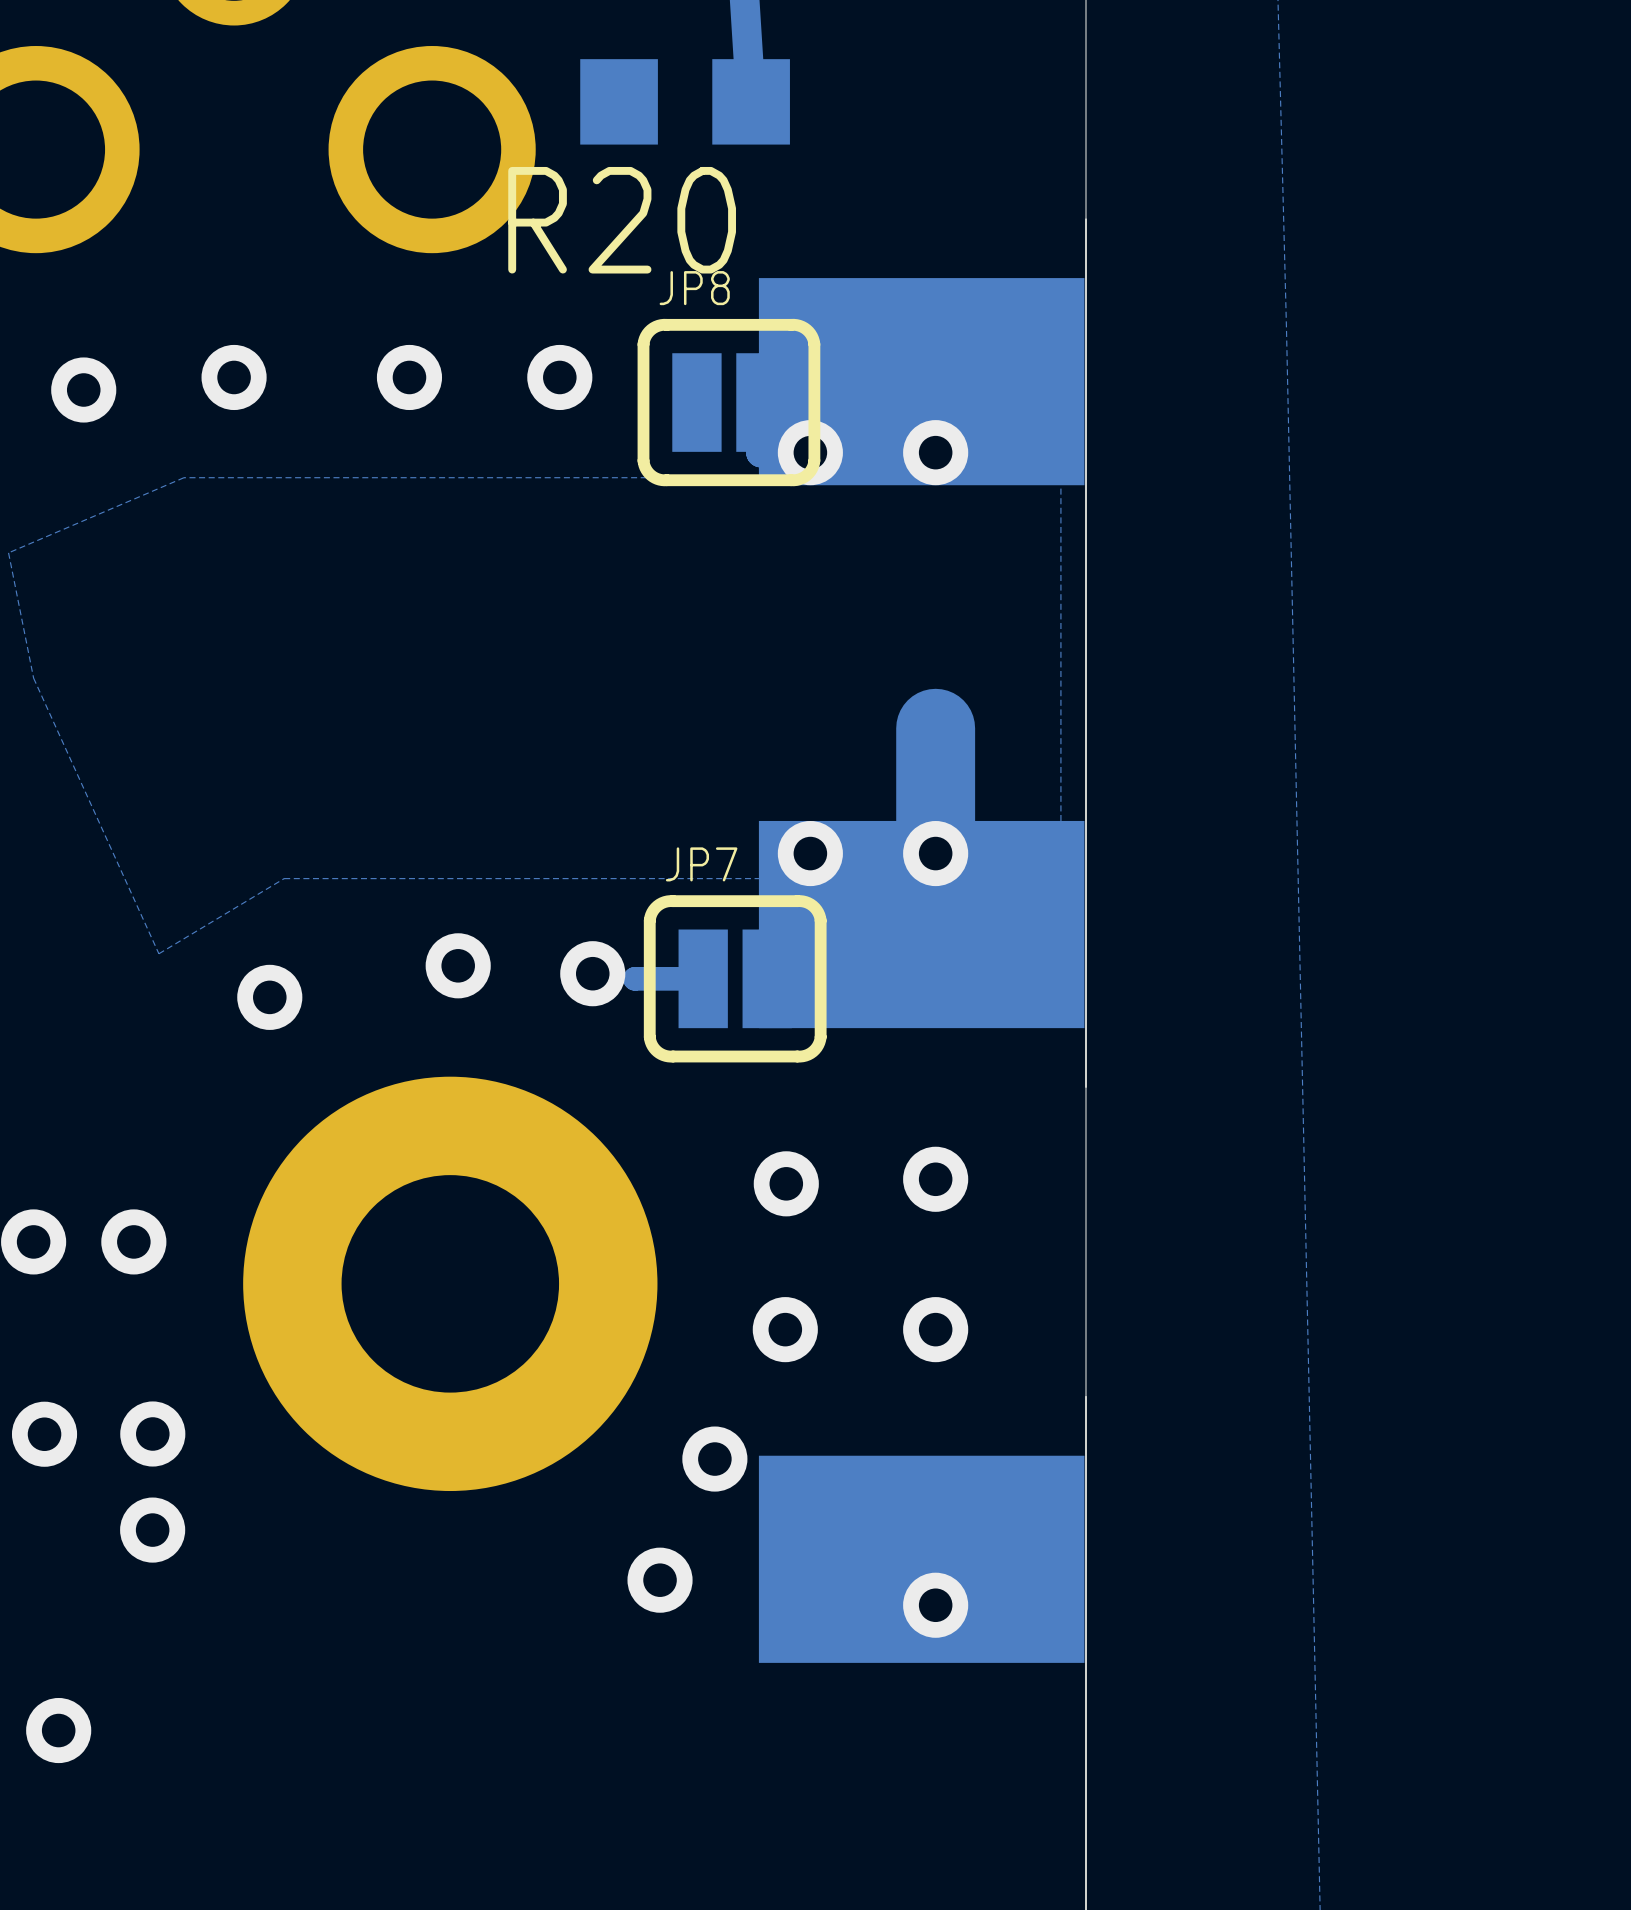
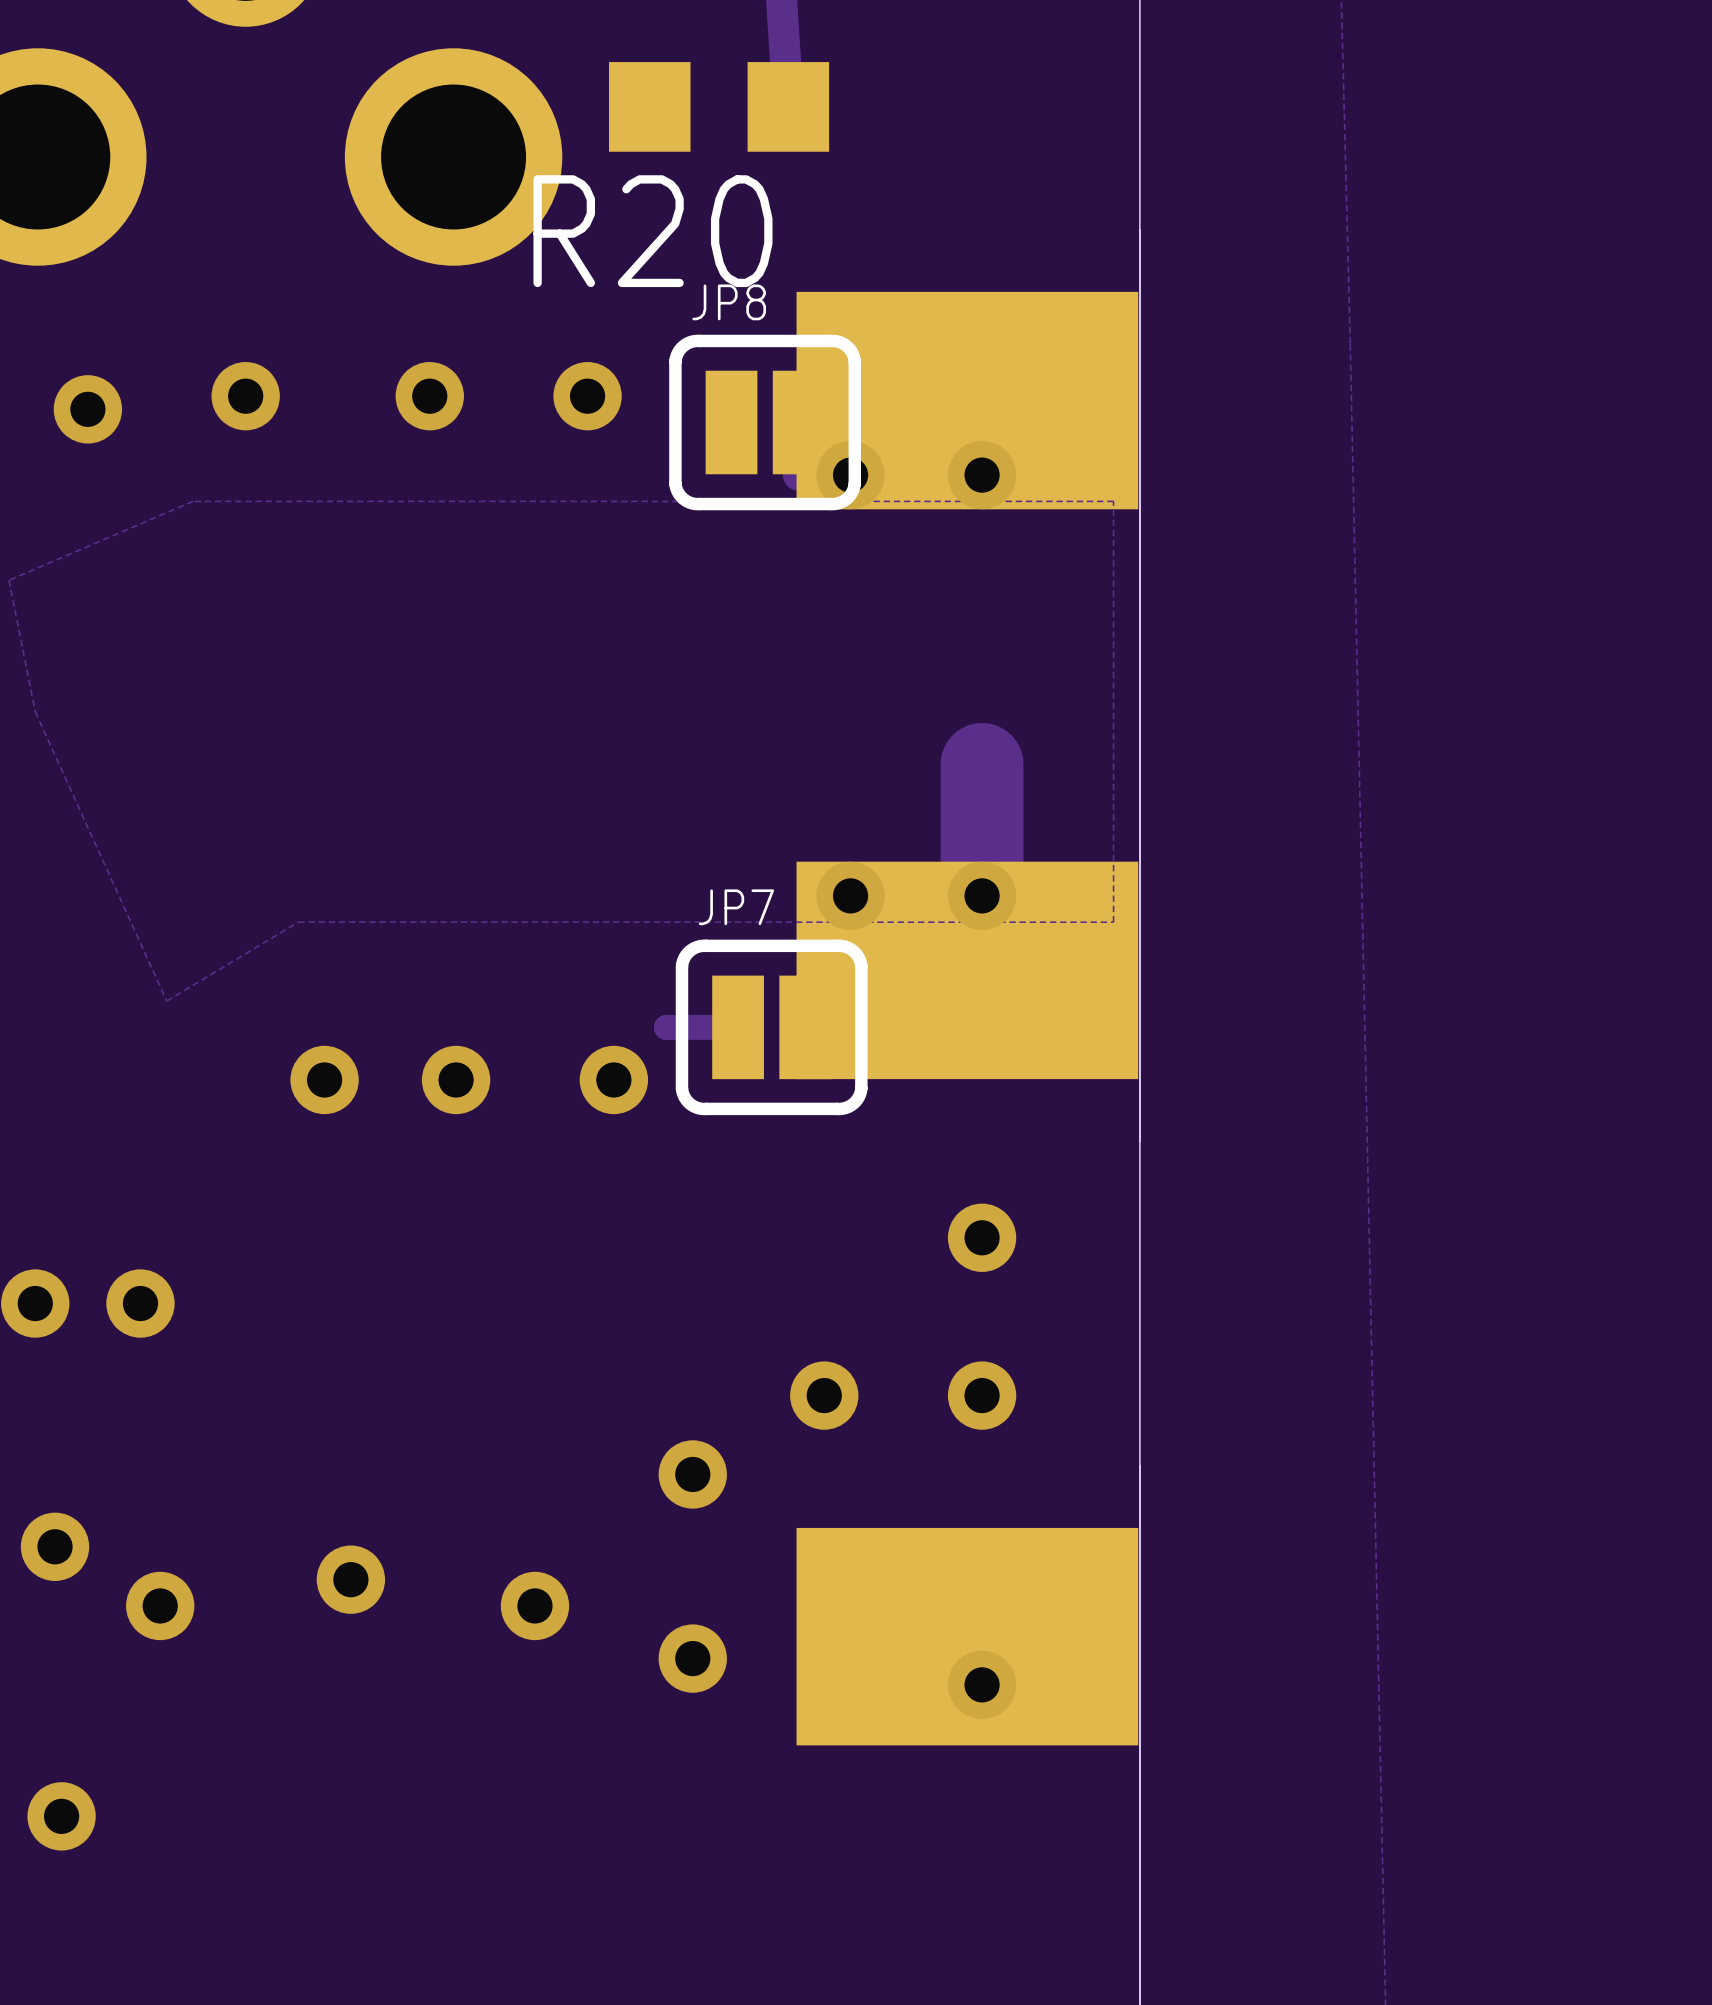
via position: (458, 965) -> (456, 1079)
via position: (592, 973) -> (613, 1079)
via position: (269, 997) -> (324, 1079)
via: (786, 1183) -> none
part: (450, 1283) -> none
via: (152, 1433) -> none
via position: (44, 1434) -> (55, 1546)
via position: (714, 1459) -> (692, 1474)
via: none -> (350, 1579)
via: none -> (534, 1605)

